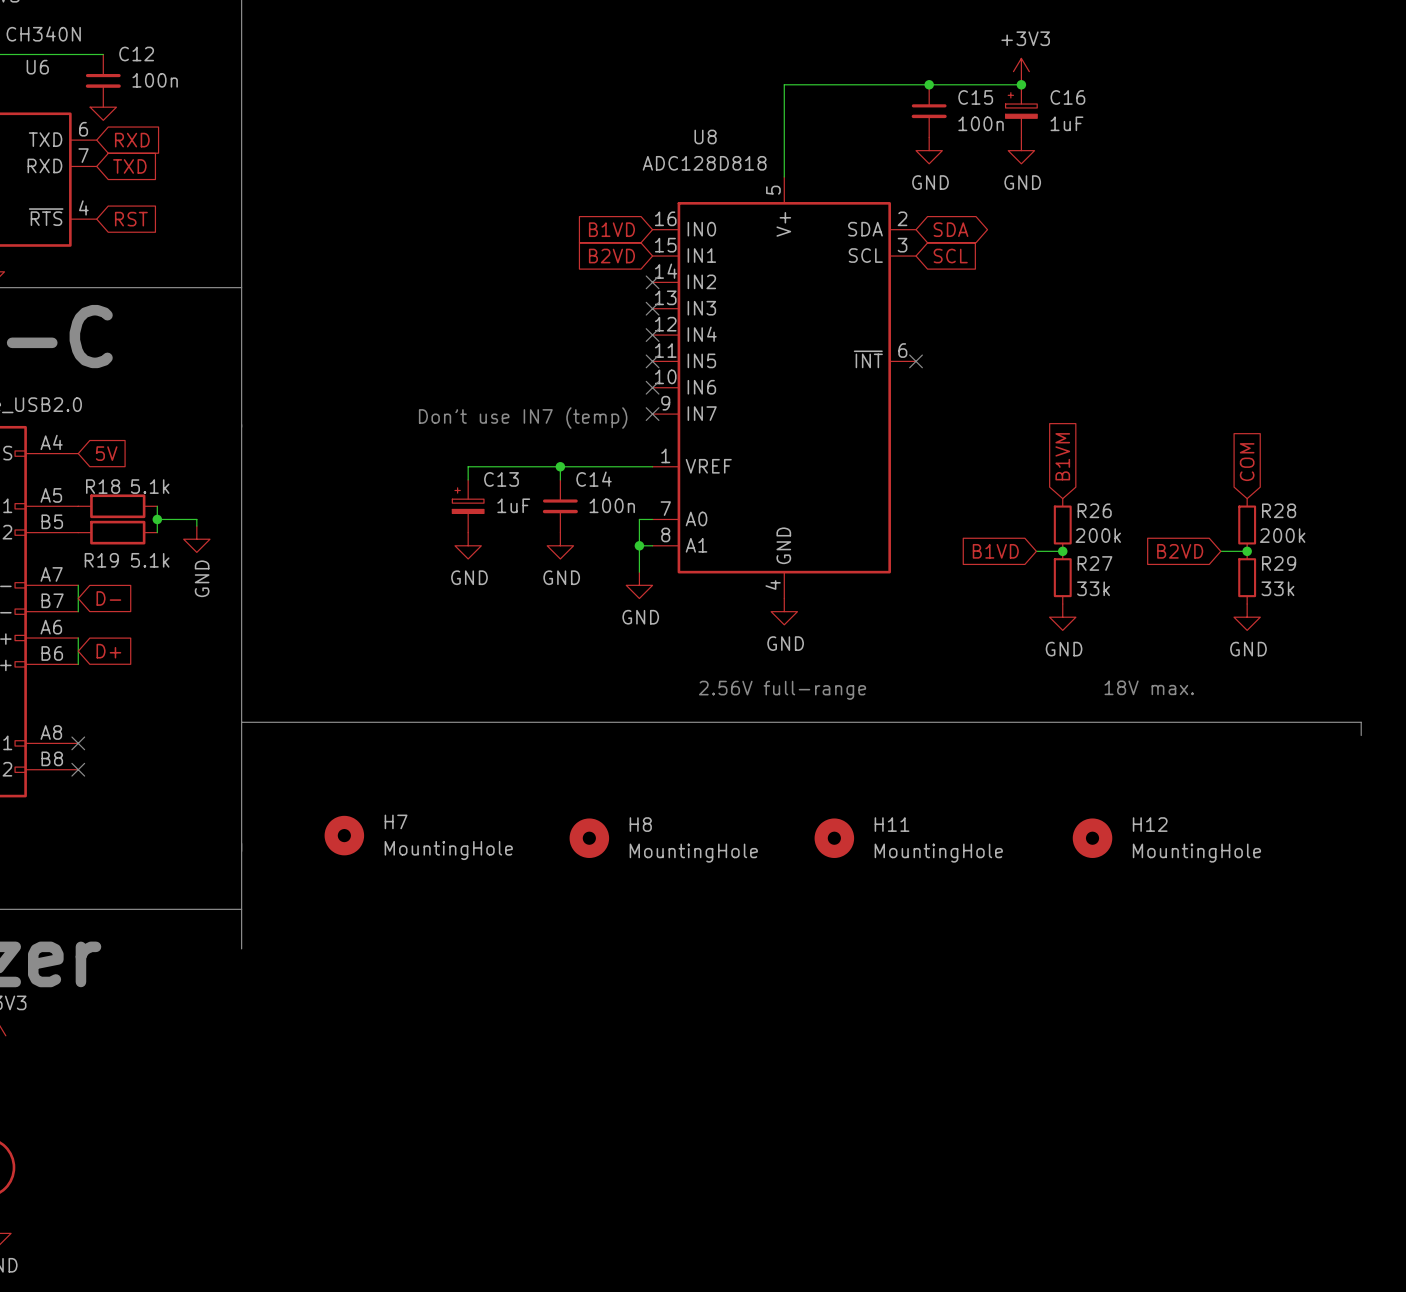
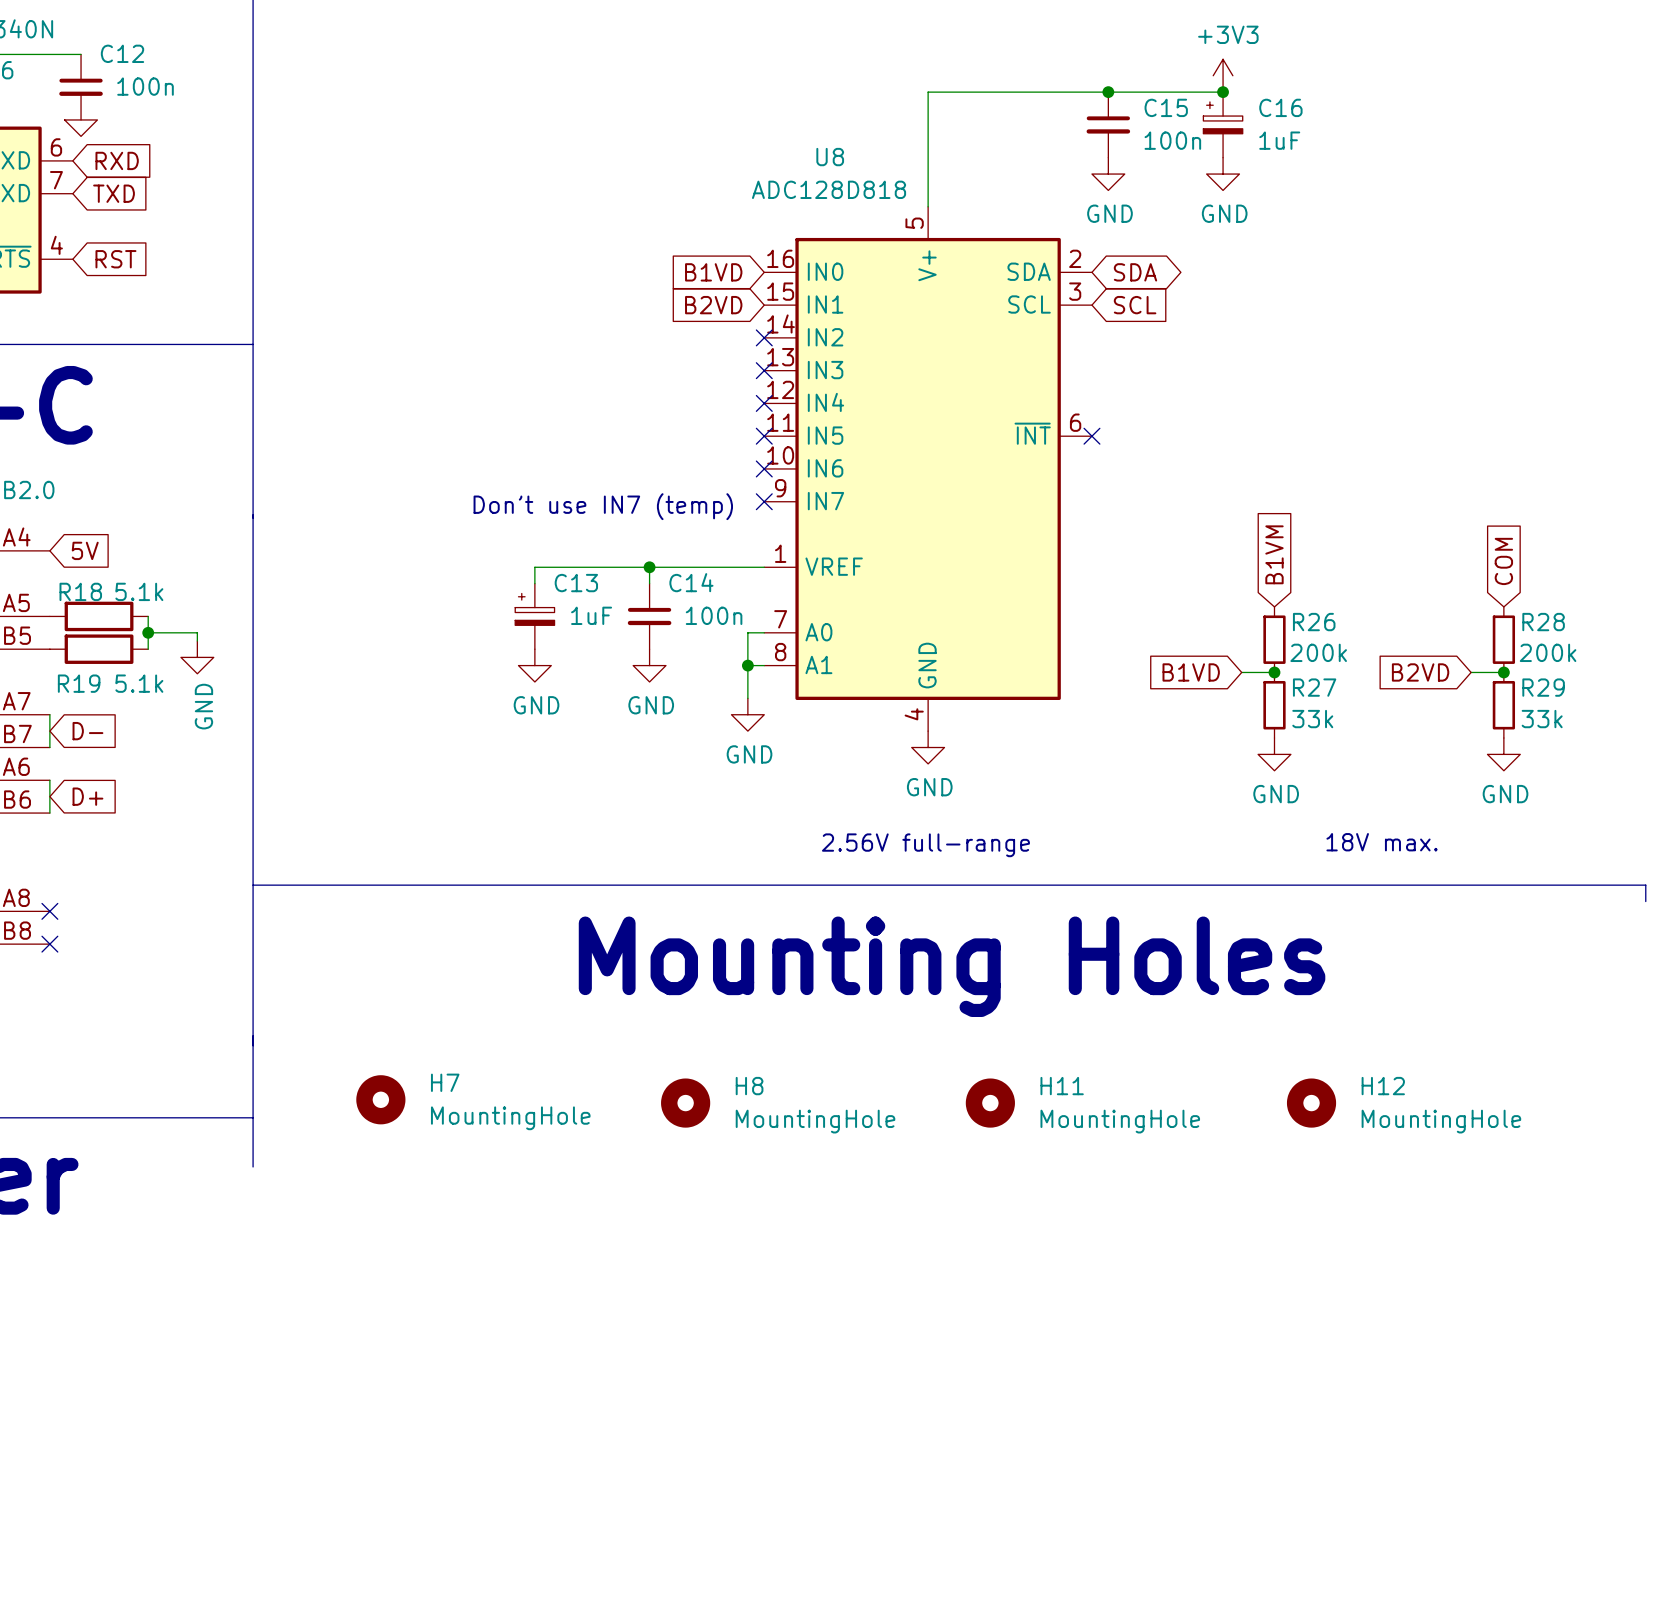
text: none -> Mounting Holes (952, 966)
H7 position: (344, 835) -> (380, 1099)
H8 position: (589, 838) -> (685, 1103)
H11 position: (834, 838) -> (990, 1103)
H12 position: (1092, 838) -> (1311, 1103)

